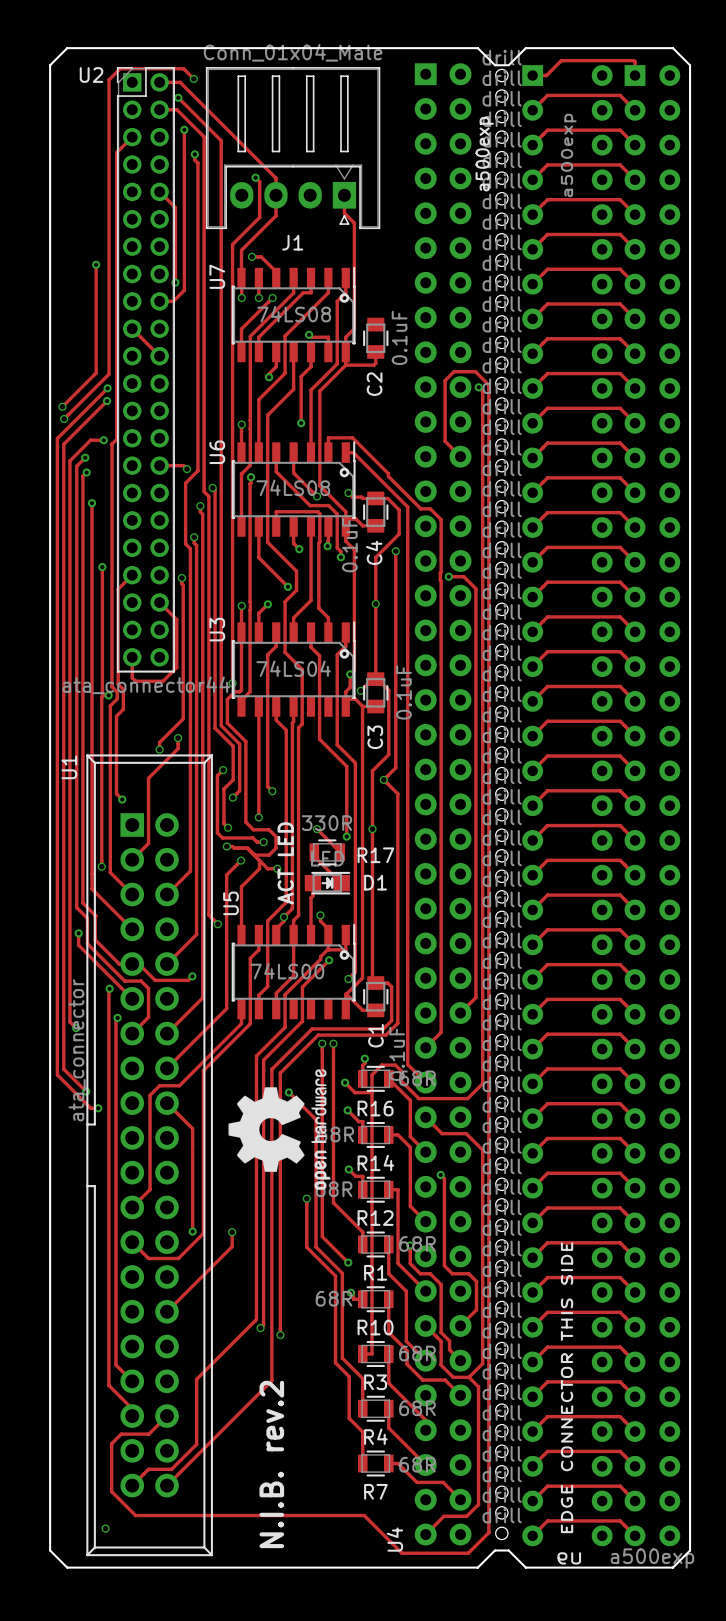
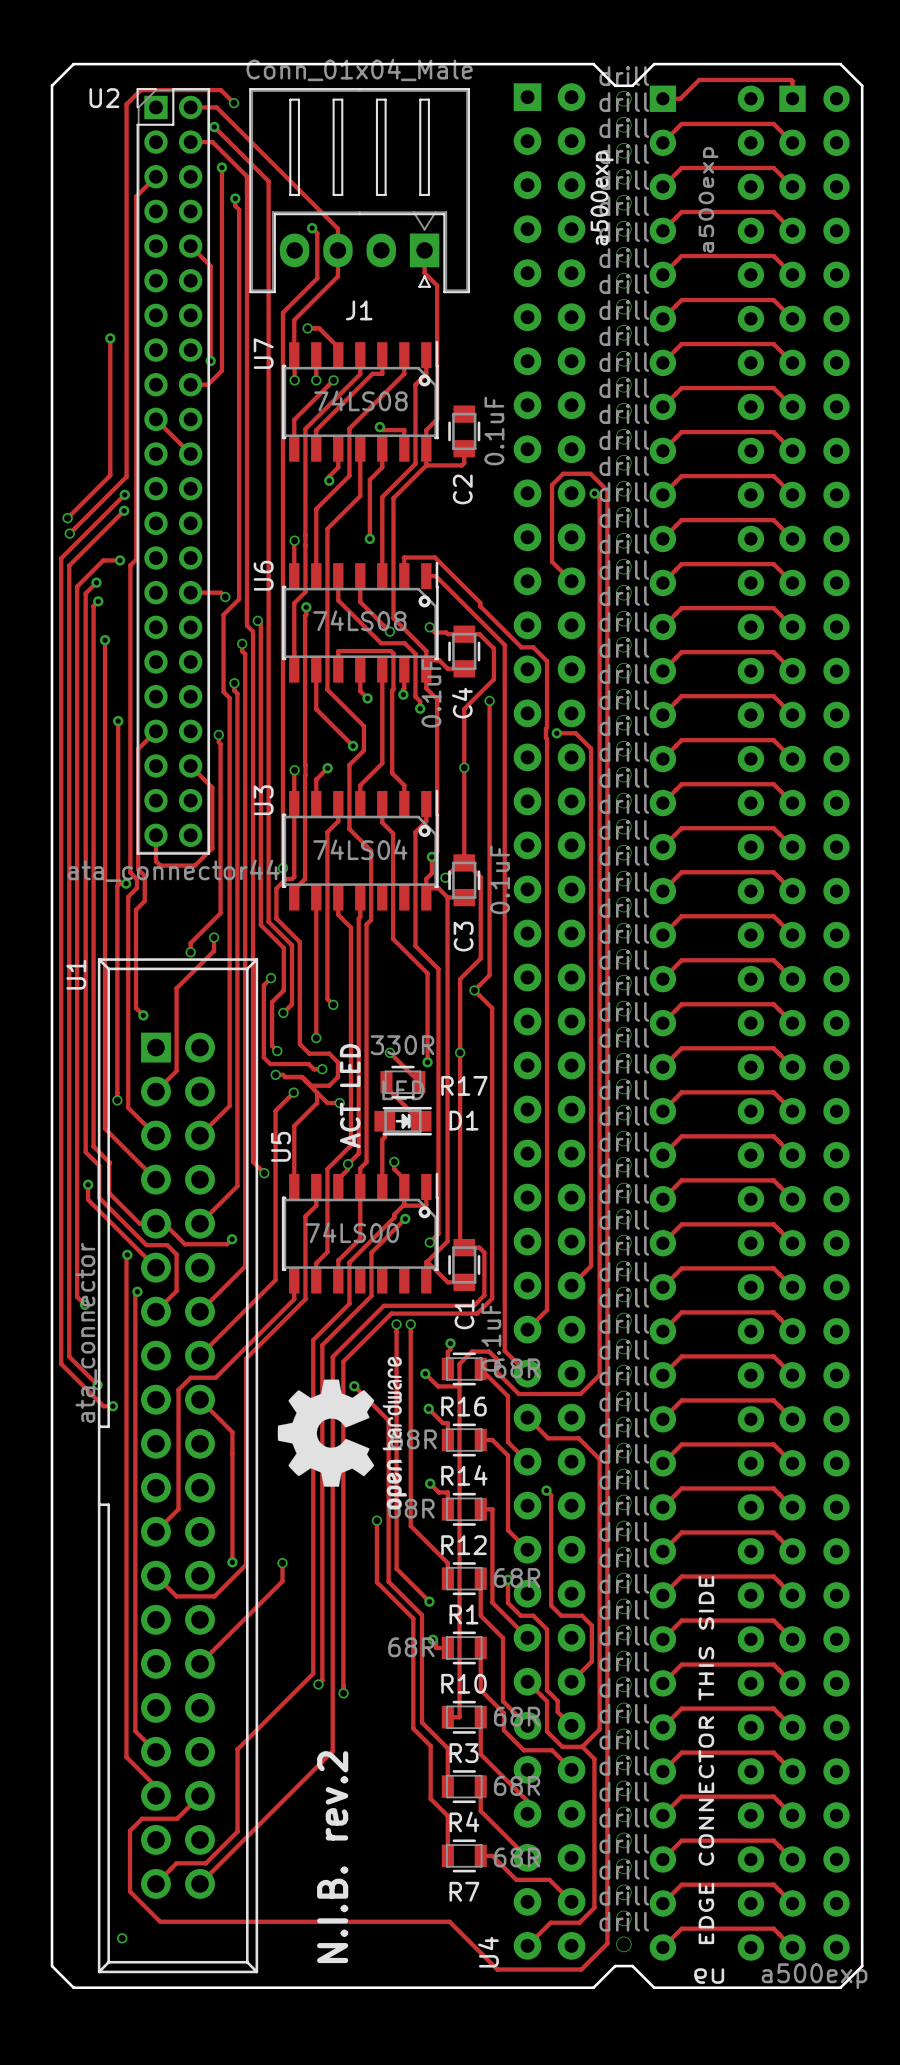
part footprint: [495, 69, 509, 82] -> [616, 90, 632, 107]
part footprint: [495, 89, 509, 103] -> [616, 116, 632, 133]
part footprint: [495, 110, 509, 123] -> [616, 142, 632, 159]
part footprint: [495, 130, 509, 144] -> [616, 168, 632, 185]
part footprint: [495, 151, 509, 164] -> [616, 194, 632, 211]
part footprint: [495, 172, 509, 185] -> [616, 220, 632, 237]
part footprint: [495, 192, 509, 205] -> [616, 246, 632, 263]
part footprint: [495, 213, 509, 226] -> [616, 272, 632, 289]
part footprint: [495, 233, 509, 246] -> [616, 298, 632, 315]
part footprint: [495, 254, 509, 267] -> [616, 324, 632, 341]
part footprint: [495, 274, 509, 288] -> [616, 350, 632, 367]
part footprint: [495, 295, 509, 308] -> [616, 376, 632, 393]
part footprint: [495, 315, 509, 329] -> [616, 402, 632, 419]
part footprint: [495, 336, 509, 349] -> [616, 428, 632, 445]
part footprint: [495, 356, 509, 370] -> [616, 454, 632, 471]
part footprint: [495, 377, 509, 390] -> [616, 480, 632, 497]
part footprint: [495, 397, 509, 411] -> [616, 506, 632, 523]
part footprint: [495, 418, 509, 431] -> [616, 532, 632, 549]
part footprint: [495, 438, 509, 452] -> [616, 558, 632, 575]
part footprint: [495, 459, 509, 472] -> [616, 584, 632, 601]
part footprint: [495, 480, 509, 493] -> [616, 610, 632, 627]
part footprint: [495, 500, 509, 513] -> [616, 636, 632, 653]
part footprint: [495, 521, 509, 534] -> [616, 662, 632, 679]
part footprint: [495, 541, 509, 554] -> [616, 688, 632, 705]
part footprint: [495, 562, 509, 575] -> [616, 714, 632, 731]
part footprint: [495, 582, 509, 596] -> [616, 740, 632, 757]
part footprint: [495, 603, 509, 616] -> [616, 766, 632, 783]
part footprint: [495, 623, 509, 637] -> [616, 792, 632, 809]
part footprint: [495, 644, 509, 657] -> [616, 818, 632, 835]
part footprint: [495, 664, 509, 678] -> [616, 844, 632, 861]
part footprint: [495, 685, 509, 698] -> [616, 870, 632, 887]
part footprint: [495, 705, 509, 719] -> [616, 896, 632, 913]
part footprint: [495, 726, 509, 739] -> [616, 922, 632, 939]
part footprint: [495, 746, 509, 760] -> [616, 948, 632, 965]
part footprint: [495, 767, 509, 780] -> [616, 974, 632, 991]
part footprint: [495, 788, 509, 801] -> [616, 1000, 632, 1017]
part footprint: [495, 808, 509, 821] -> [616, 1026, 632, 1043]
part footprint: [495, 829, 509, 842] -> [616, 1052, 632, 1069]
part footprint: [495, 849, 509, 862] -> [616, 1078, 632, 1095]
part footprint: [495, 870, 509, 883] -> [616, 1104, 632, 1121]
part footprint: [495, 890, 509, 904] -> [616, 1130, 632, 1147]
part footprint: [495, 911, 509, 924] -> [616, 1156, 632, 1173]
part footprint: [495, 931, 509, 945] -> [616, 1182, 632, 1199]
part footprint: [495, 952, 509, 965] -> [616, 1208, 632, 1225]
part footprint: [495, 972, 509, 986] -> [616, 1234, 632, 1251]
part footprint: [495, 993, 509, 1006] -> [616, 1260, 632, 1277]
part footprint: [495, 1013, 509, 1027] -> [616, 1286, 632, 1303]
part footprint: [495, 1034, 509, 1047] -> [616, 1312, 632, 1329]
part footprint: [495, 1054, 509, 1068] -> [616, 1338, 632, 1355]
part footprint: [495, 1075, 509, 1088] -> [616, 1364, 632, 1381]
part footprint: [495, 1096, 509, 1109] -> [616, 1390, 632, 1407]
part footprint: [495, 1116, 509, 1129] -> [616, 1416, 632, 1433]
part footprint: [495, 1137, 509, 1150] -> [616, 1442, 632, 1459]
part footprint: [495, 1157, 509, 1170] -> [616, 1468, 632, 1485]
part footprint: [495, 1178, 509, 1191] -> [616, 1494, 632, 1511]
part footprint: [495, 1198, 509, 1212] -> [616, 1520, 632, 1537]
part footprint: [495, 1219, 509, 1232] -> [616, 1546, 632, 1563]
part footprint: [495, 1239, 509, 1253] -> [616, 1572, 632, 1589]
part footprint: [495, 1260, 509, 1273] -> [616, 1598, 632, 1615]
part footprint: [495, 1280, 509, 1294] -> [616, 1624, 632, 1641]
part footprint: [495, 1301, 509, 1314] -> [616, 1650, 632, 1667]
part footprint: [495, 1321, 509, 1335] -> [616, 1676, 632, 1693]
part footprint: [495, 1342, 509, 1355] -> [616, 1702, 632, 1719]
part footprint: [495, 1362, 509, 1376] -> [616, 1728, 632, 1745]
part footprint: [495, 1383, 509, 1396] -> [616, 1754, 632, 1771]
part footprint: [495, 1404, 509, 1417] -> [616, 1780, 632, 1797]
part footprint: [495, 1424, 509, 1437] -> [616, 1806, 632, 1823]
part footprint: [495, 1445, 509, 1458] -> [616, 1832, 632, 1849]
part footprint: [495, 1465, 509, 1478] -> [616, 1858, 632, 1875]
part footprint: [495, 1486, 509, 1499] -> [616, 1884, 632, 1901]
part footprint: [495, 1506, 509, 1520] -> [616, 1910, 632, 1927]
part footprint: [495, 1527, 509, 1540] -> [616, 1936, 632, 1953]

